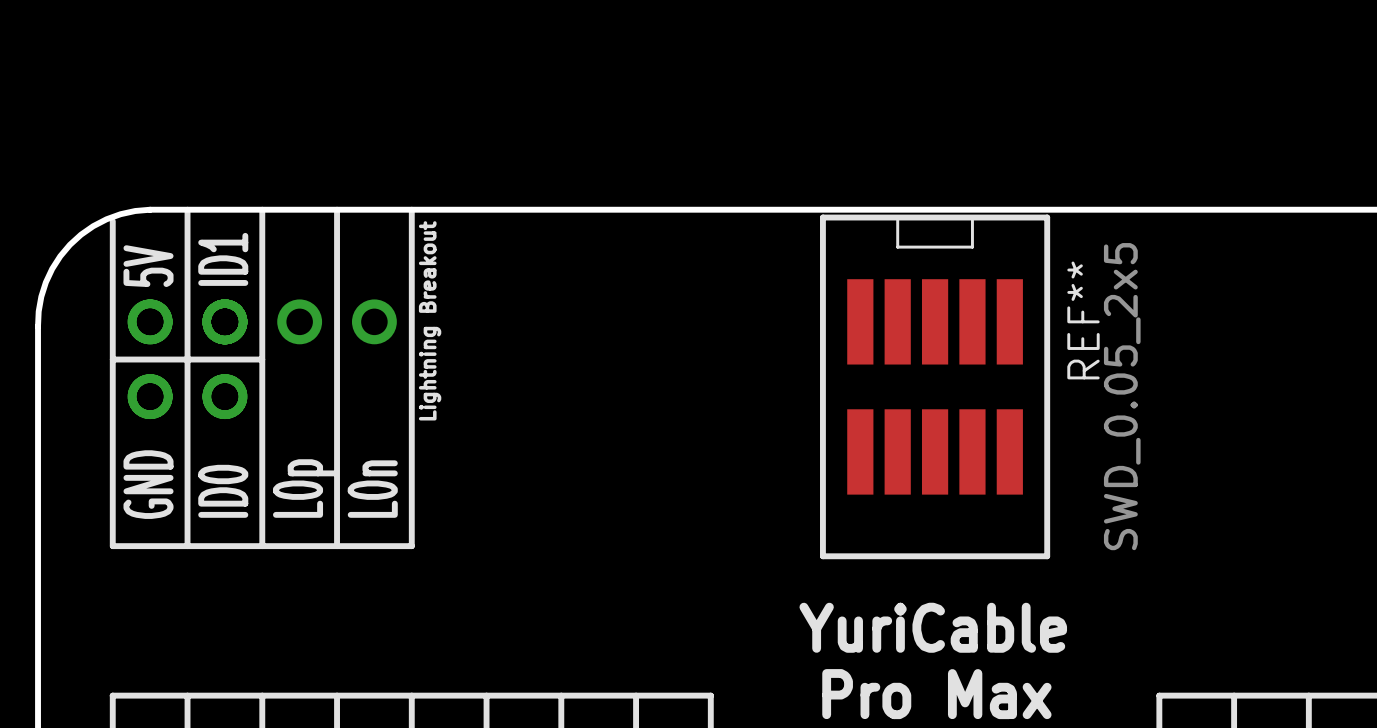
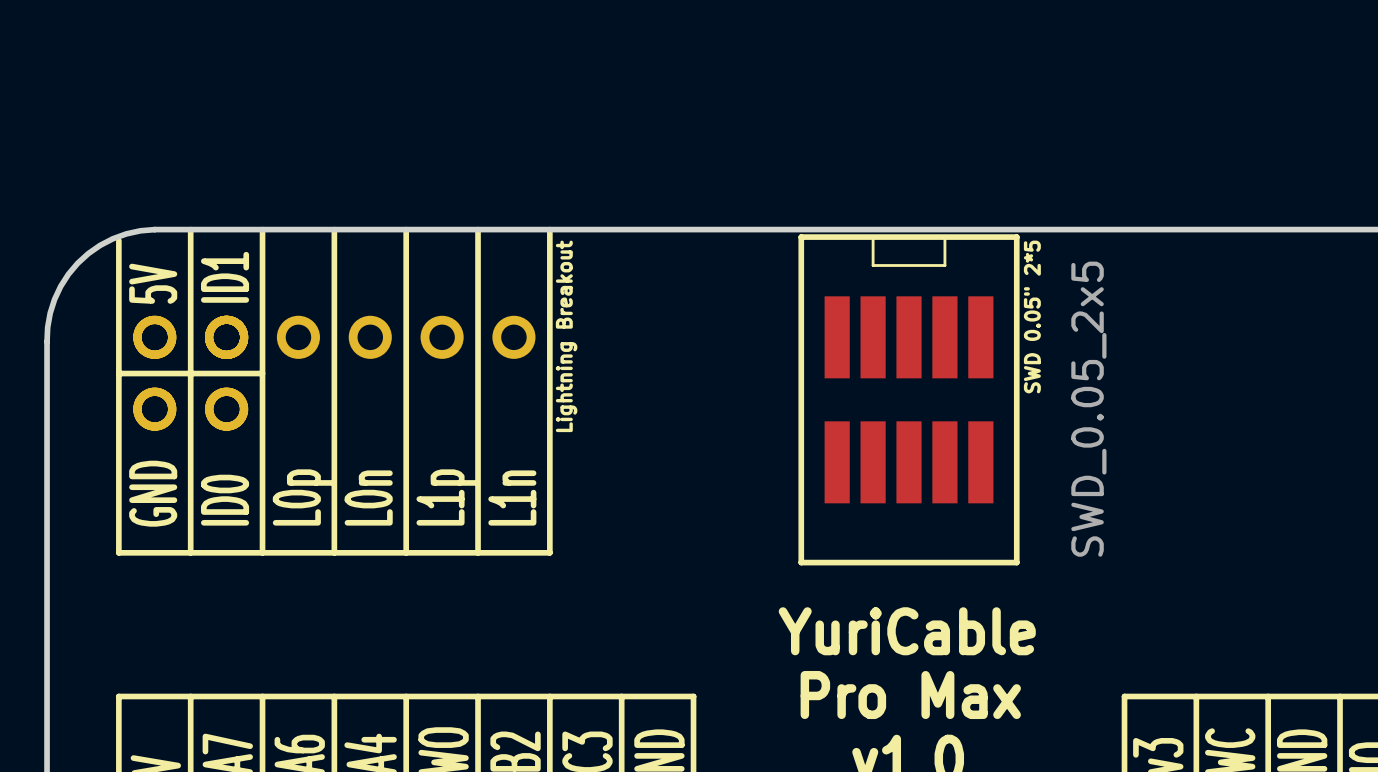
line: none -> (478, 229) (478, 552)
line: none -> (549, 229) (549, 552) (406, 552)
text position: Lightning Breakout (430, 320) -> Lightning Breakout (566, 336)
REF** name: REF** (1083, 320) -> SWD 0.05" 2*5 (1032, 316)
part: none -> (442, 337)
part: none -> (513, 337)
text: none -> L1p (447, 497)
text: none -> L1n (512, 498)

